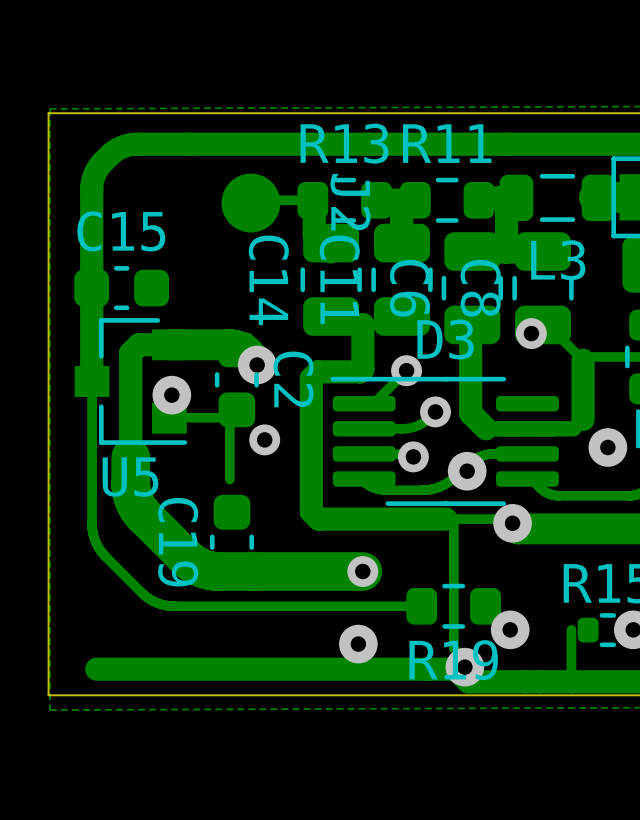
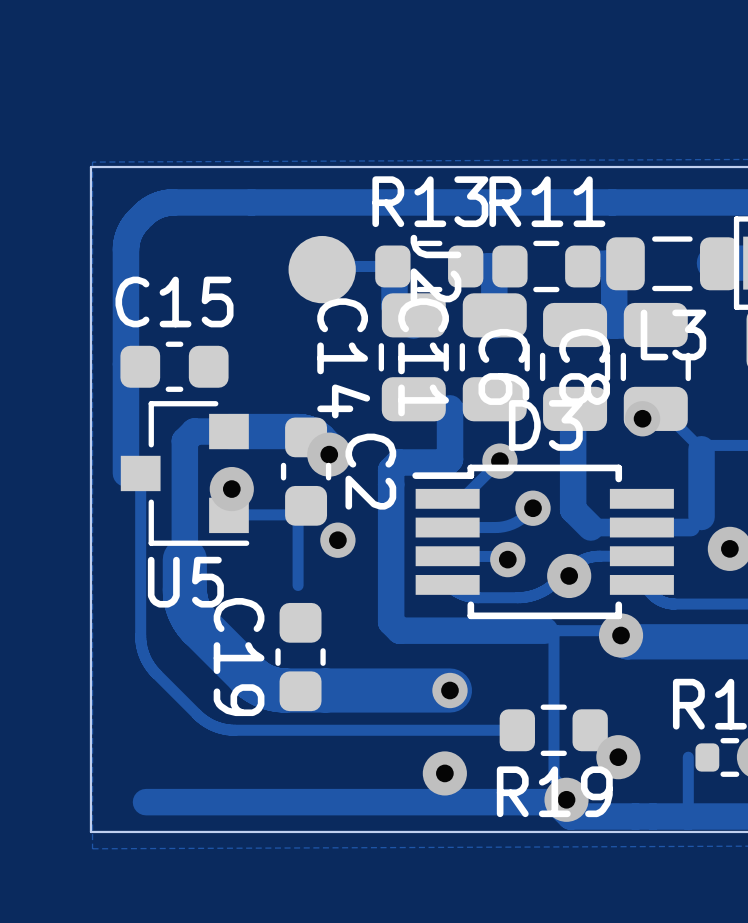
track: (136, 144) (125, 145) (112, 153) (98, 167) (92, 181) (91, 381) -> (191, 202) (167, 202) (151, 208) (135, 223) (127, 239) (125, 473)
D3 footprint: [330, 376, 559, 506] -> [412, 464, 674, 620]

